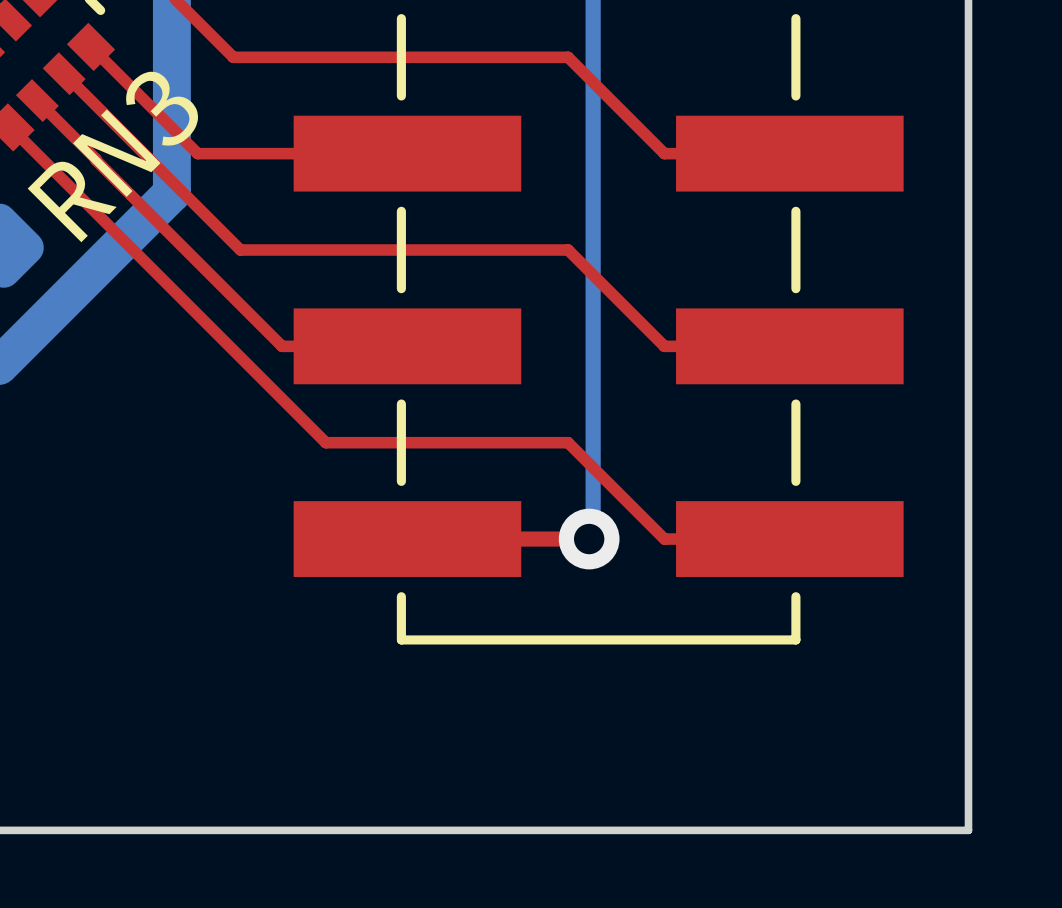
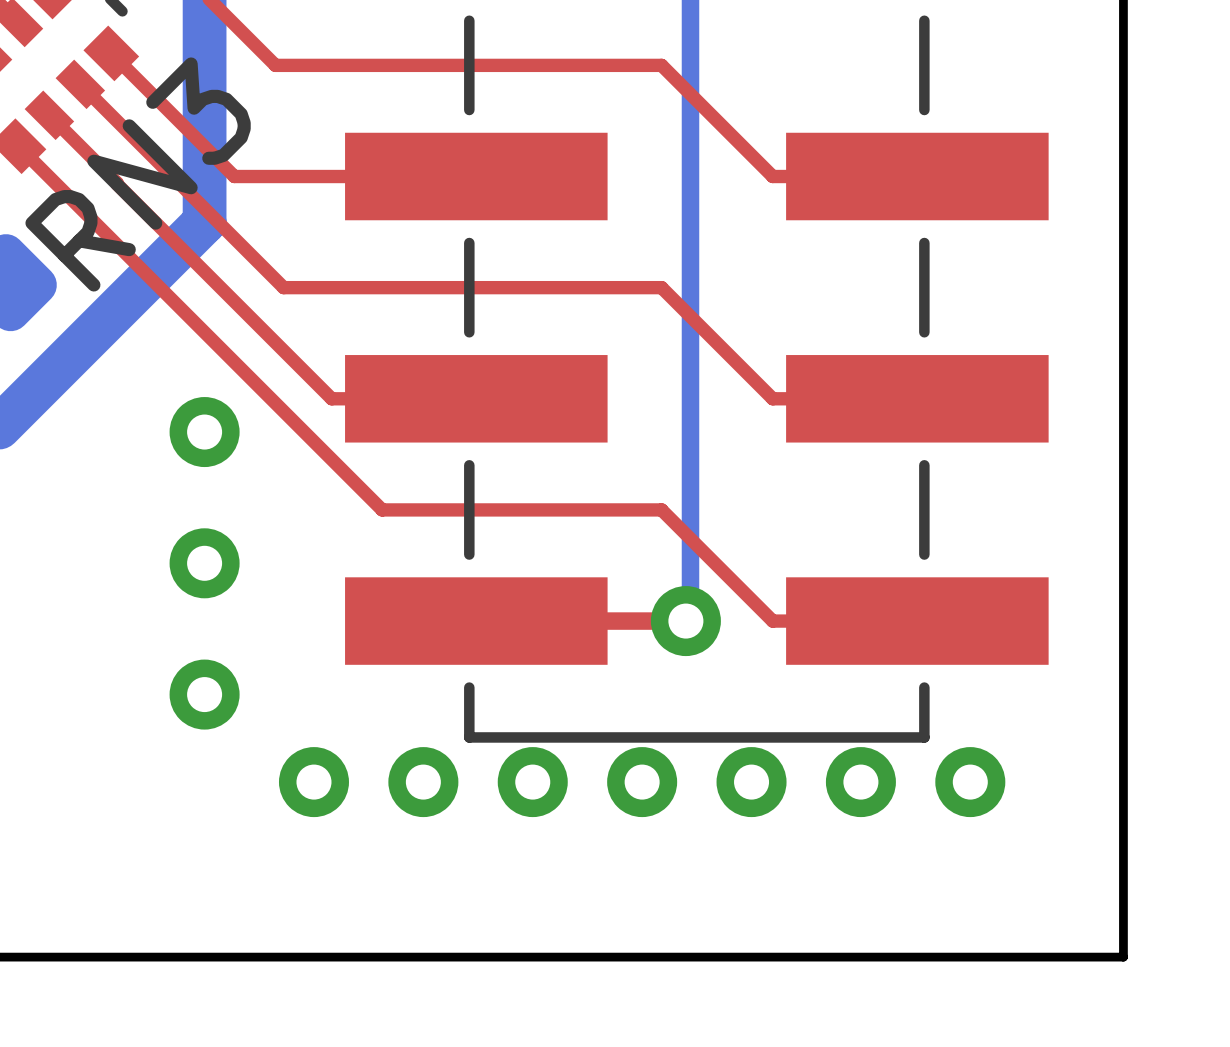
via: none -> (204, 432)
via: none -> (204, 563)
via: none -> (204, 694)
via: none -> (313, 782)
via: none -> (423, 782)
via: none -> (532, 782)
via: none -> (642, 782)
via: none -> (751, 782)
via: none -> (860, 782)
via: none -> (970, 782)

